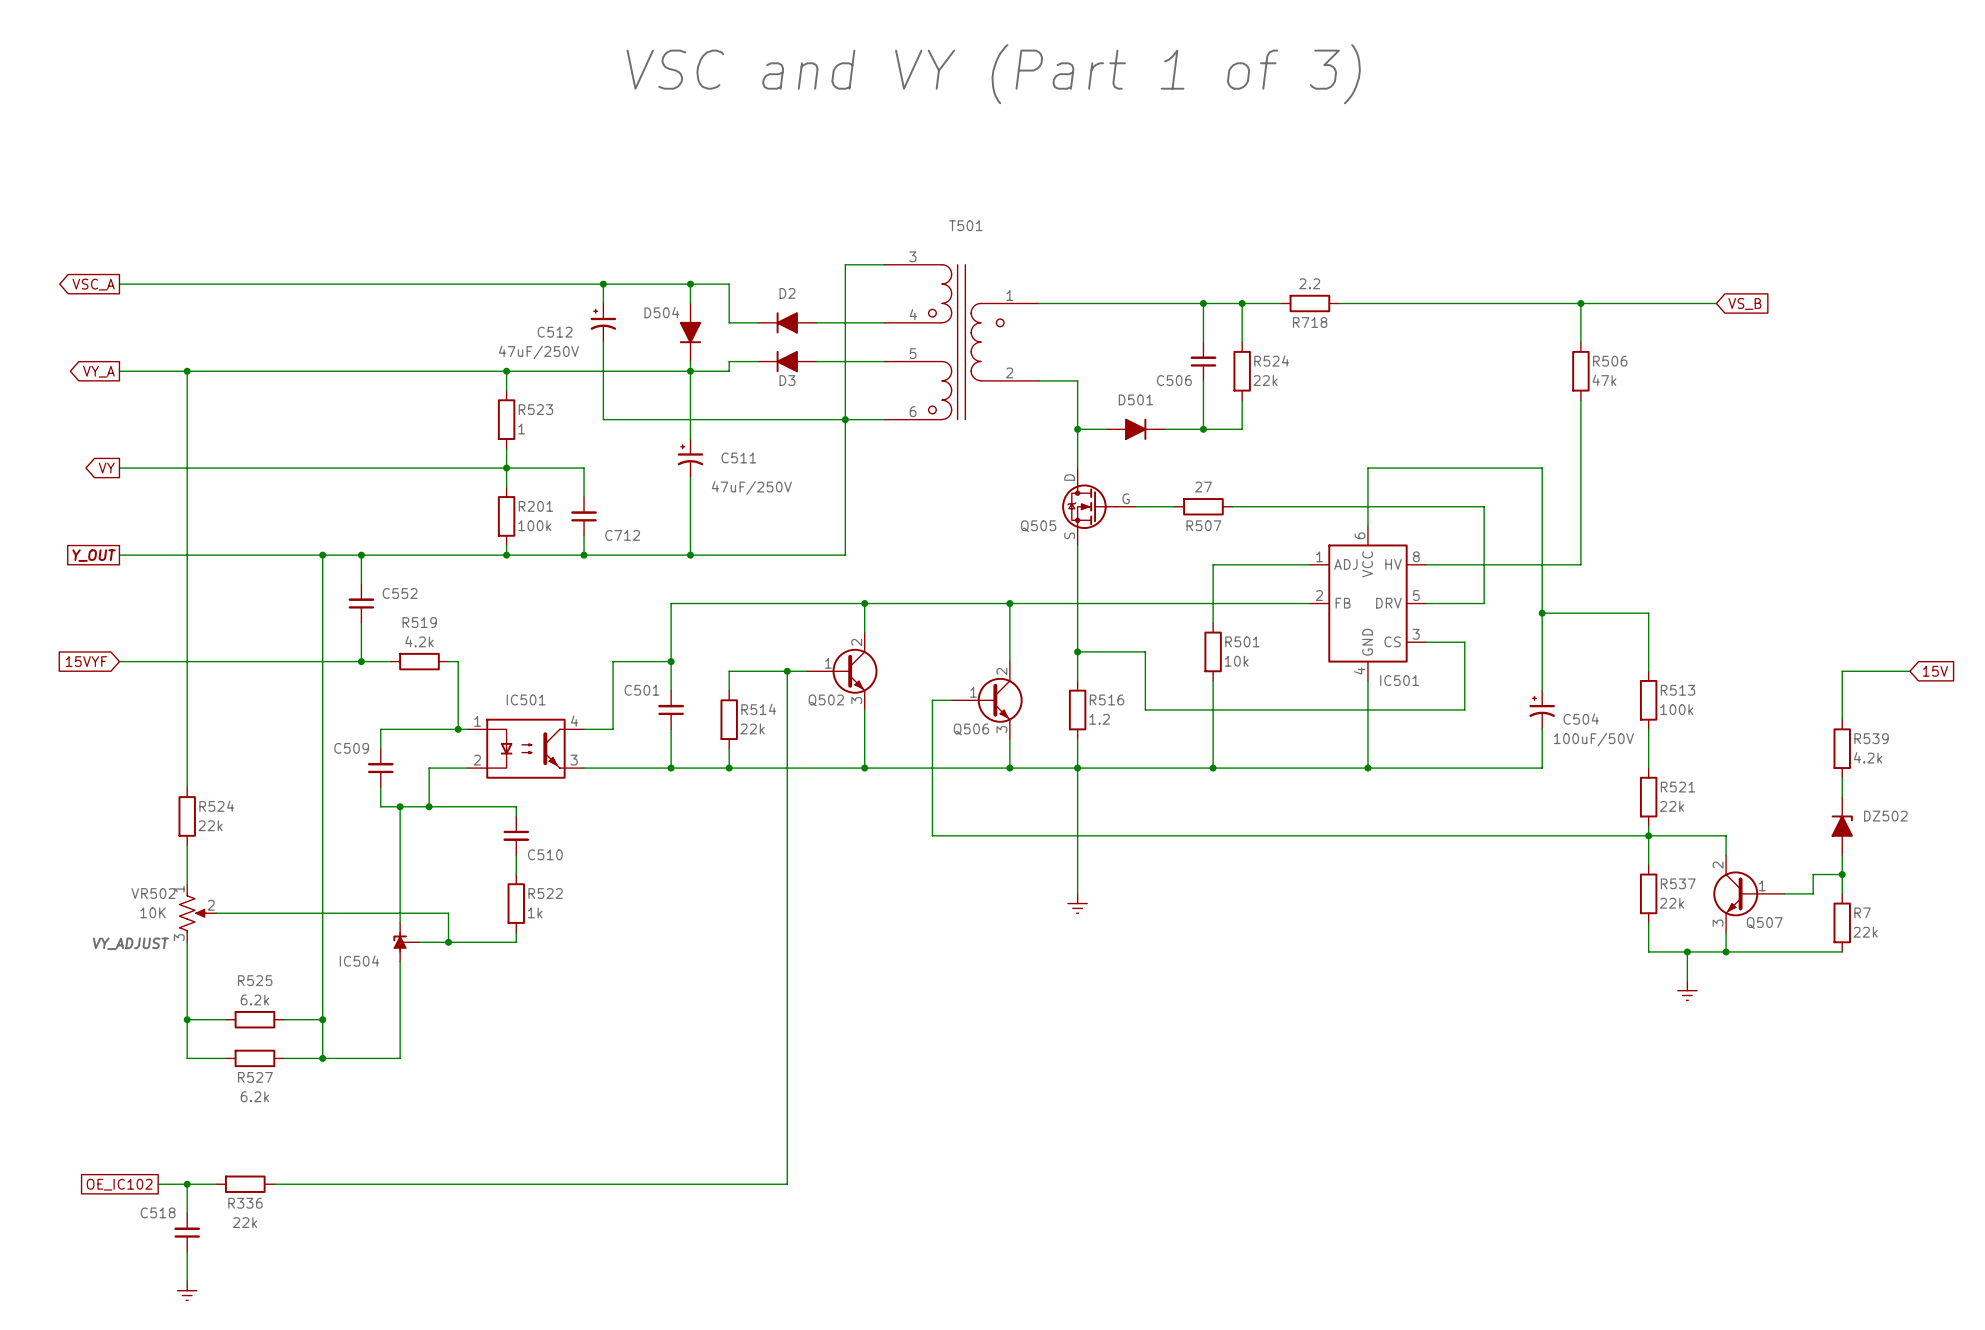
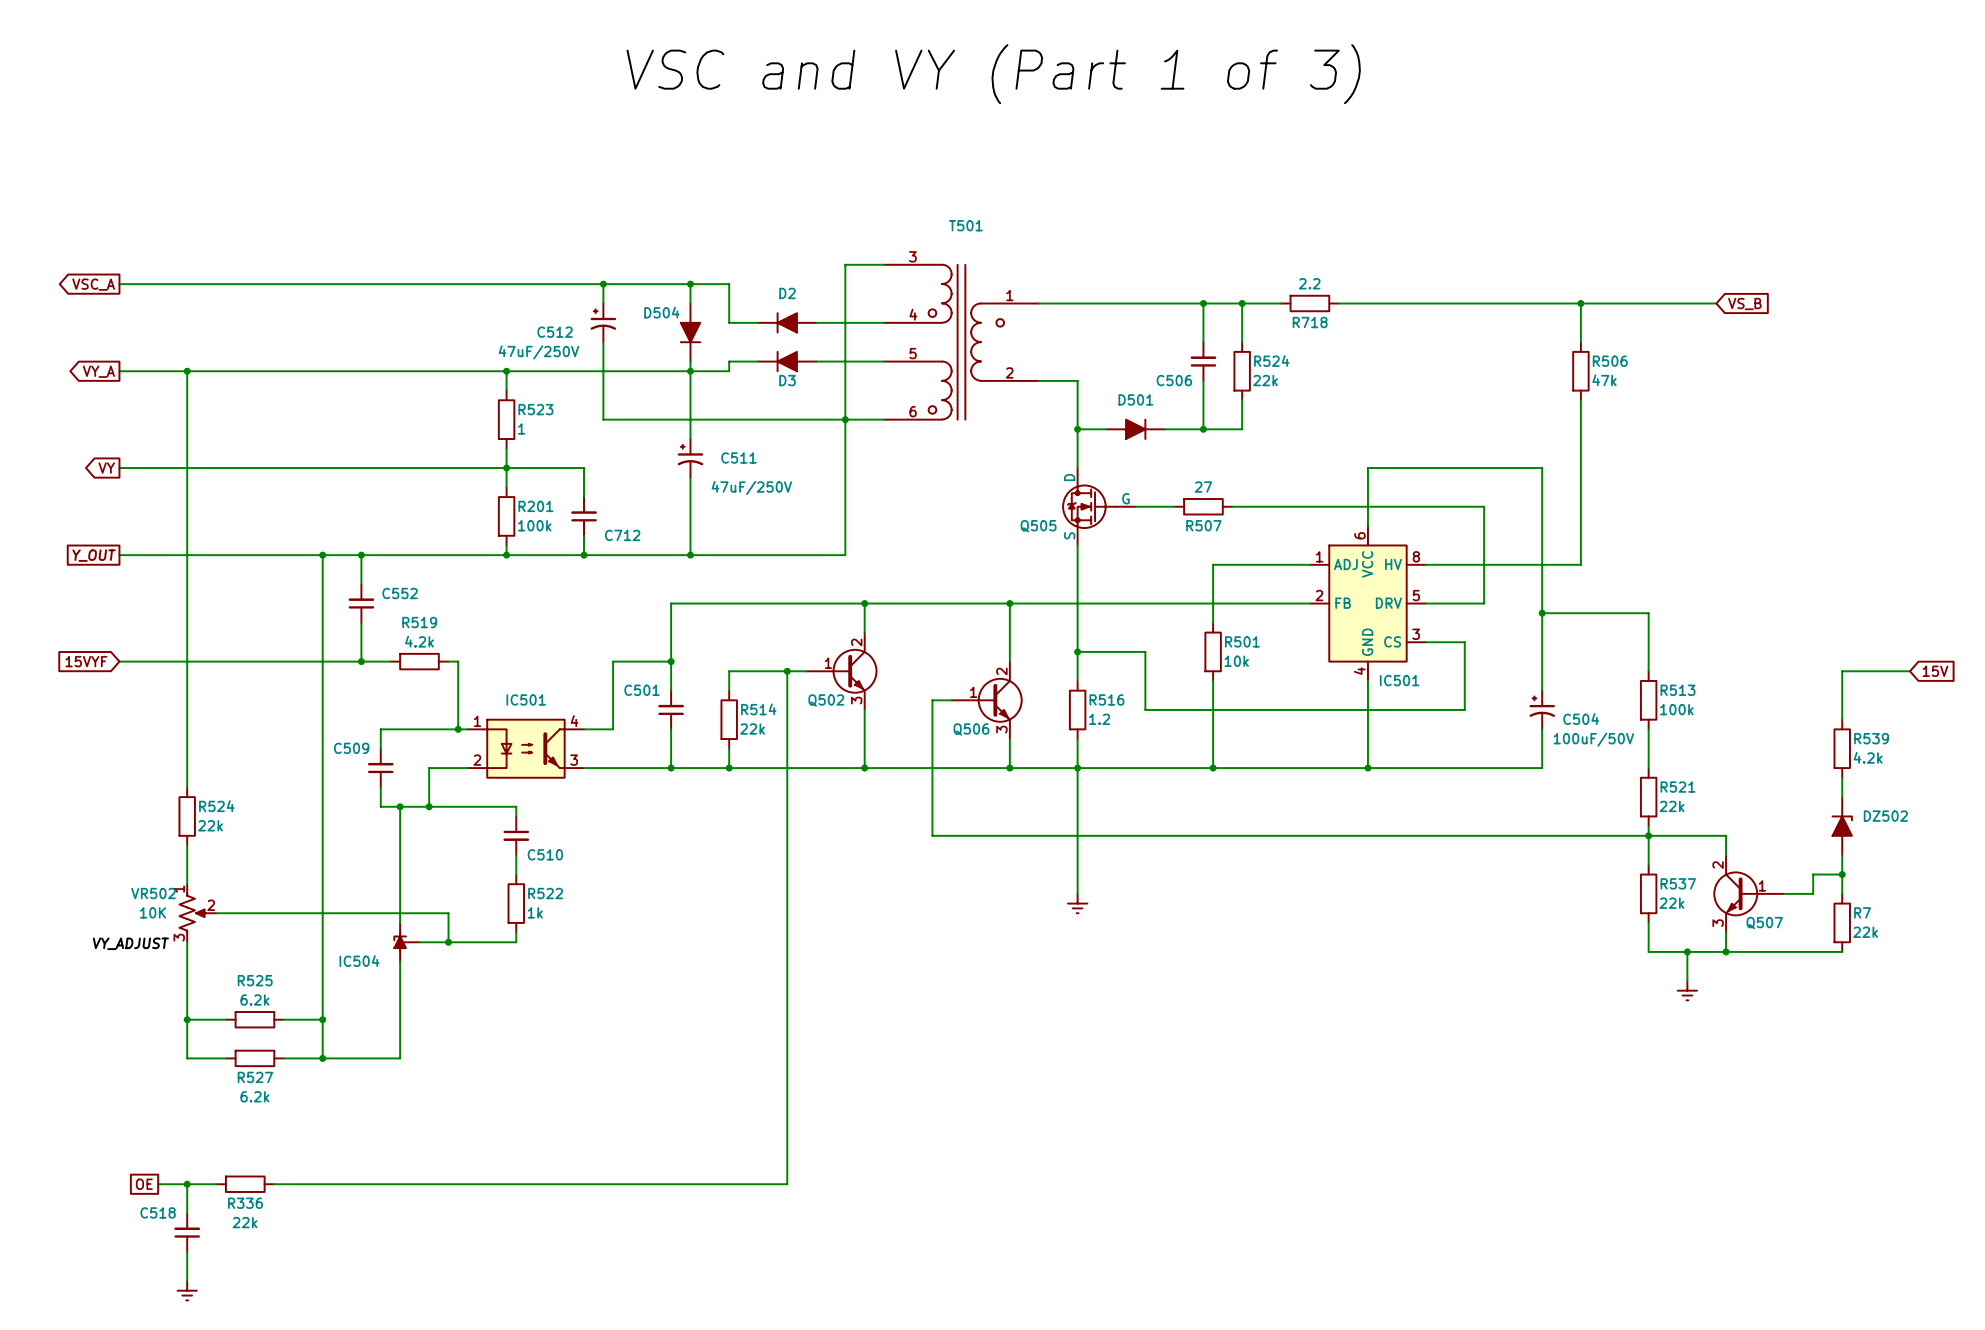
global label: OE_IC102 (119, 1184) -> OE (144, 1184)

